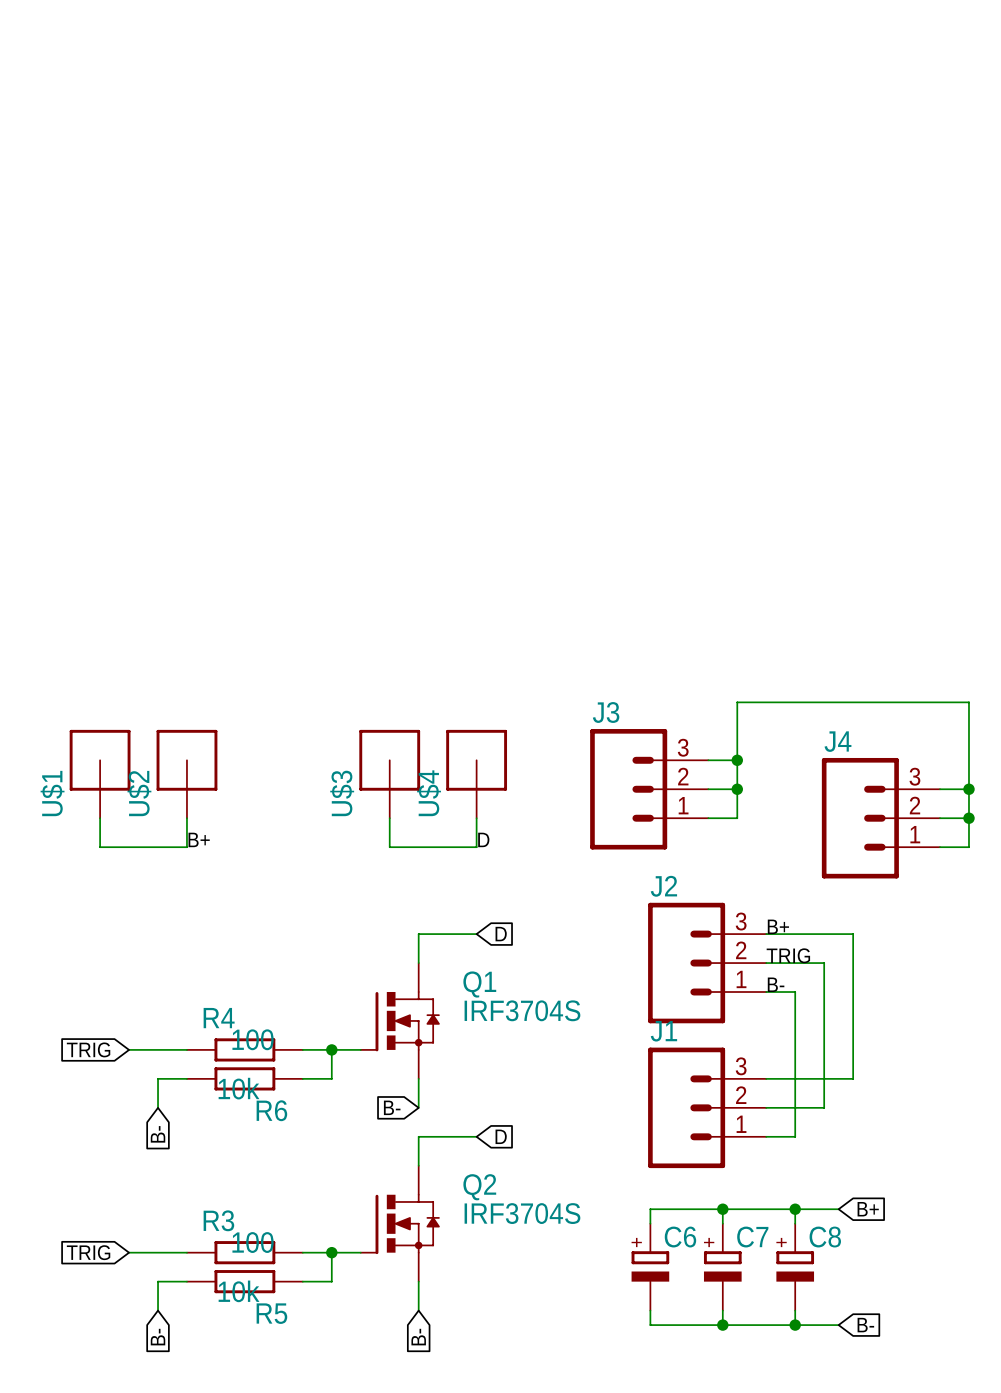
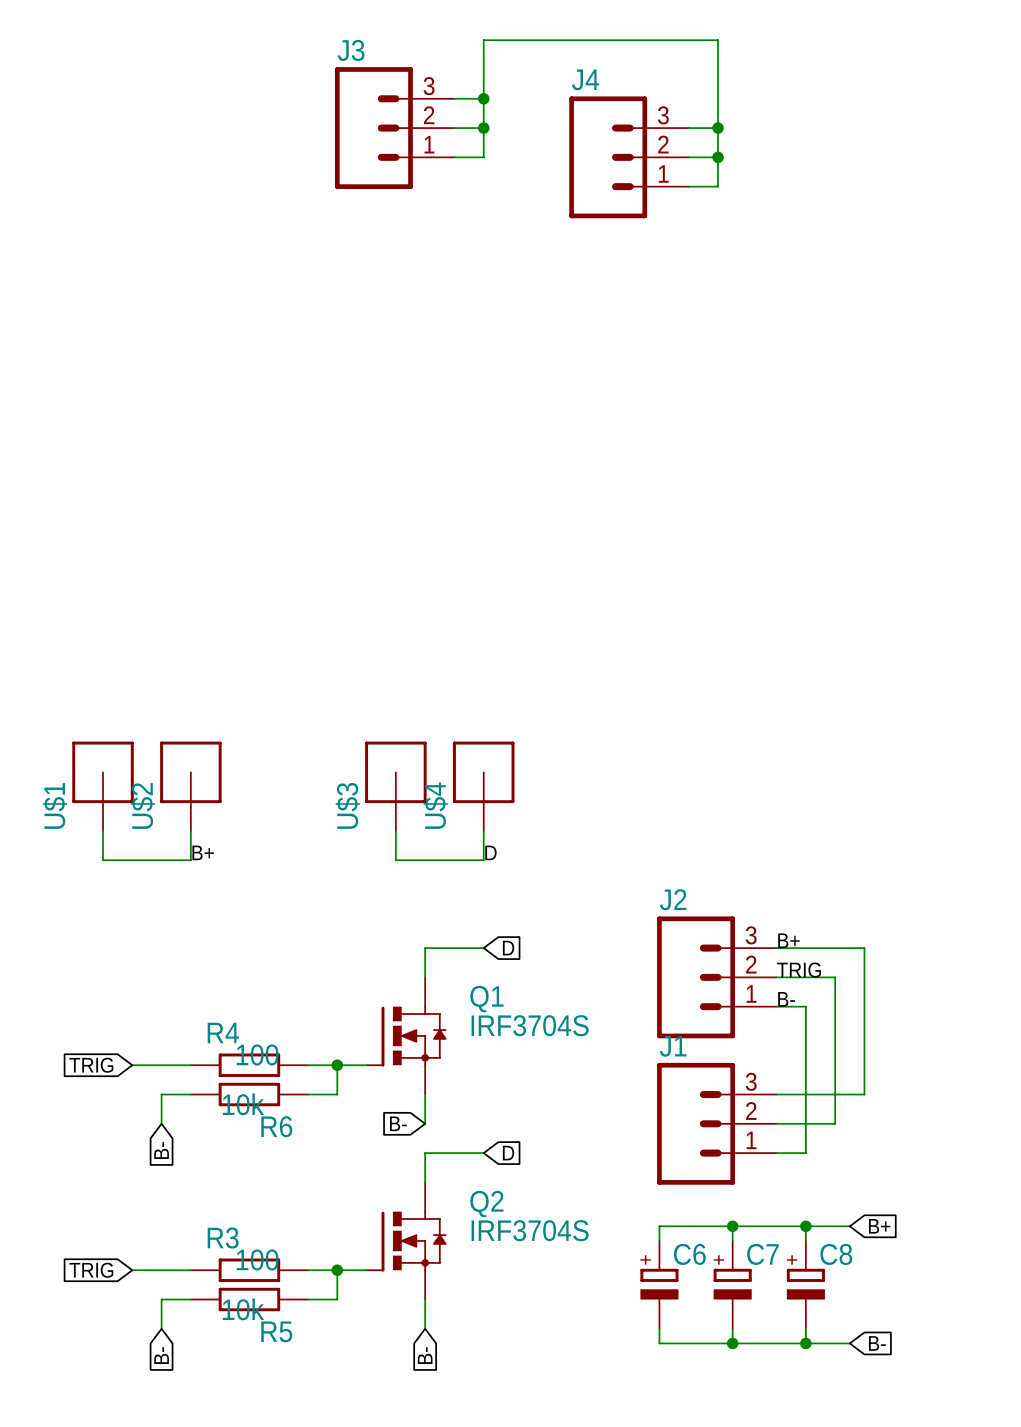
wire: none -> (454, 98) (483, 98)
junction: none -> (483, 98)
wire: none -> (454, 128) (483, 128)
junction: none -> (483, 128)
wire: none -> (688, 128) (718, 128)
junction: none -> (718, 128)
wire: none -> (454, 157) (483, 157) (483, 40) (718, 40) (718, 186) (688, 186)
wire: none -> (688, 157) (718, 157)
junction: none -> (718, 157)
wire: (708, 760) (737, 760) -> none
junction: (737, 760) -> none
J3 position: (649, 789) -> (394, 128)
wire: (708, 789) (737, 789) -> none
junction: (737, 789) -> none
wire: (940, 789) (968, 789) -> none
junction: (968, 789) -> none
wire: (708, 818) (737, 818) (737, 702) (968, 702) (968, 847) (940, 847) -> none
J4 position: (880, 818) -> (628, 157)
wire: (940, 818) (968, 818) -> none
junction: (968, 818) -> none

